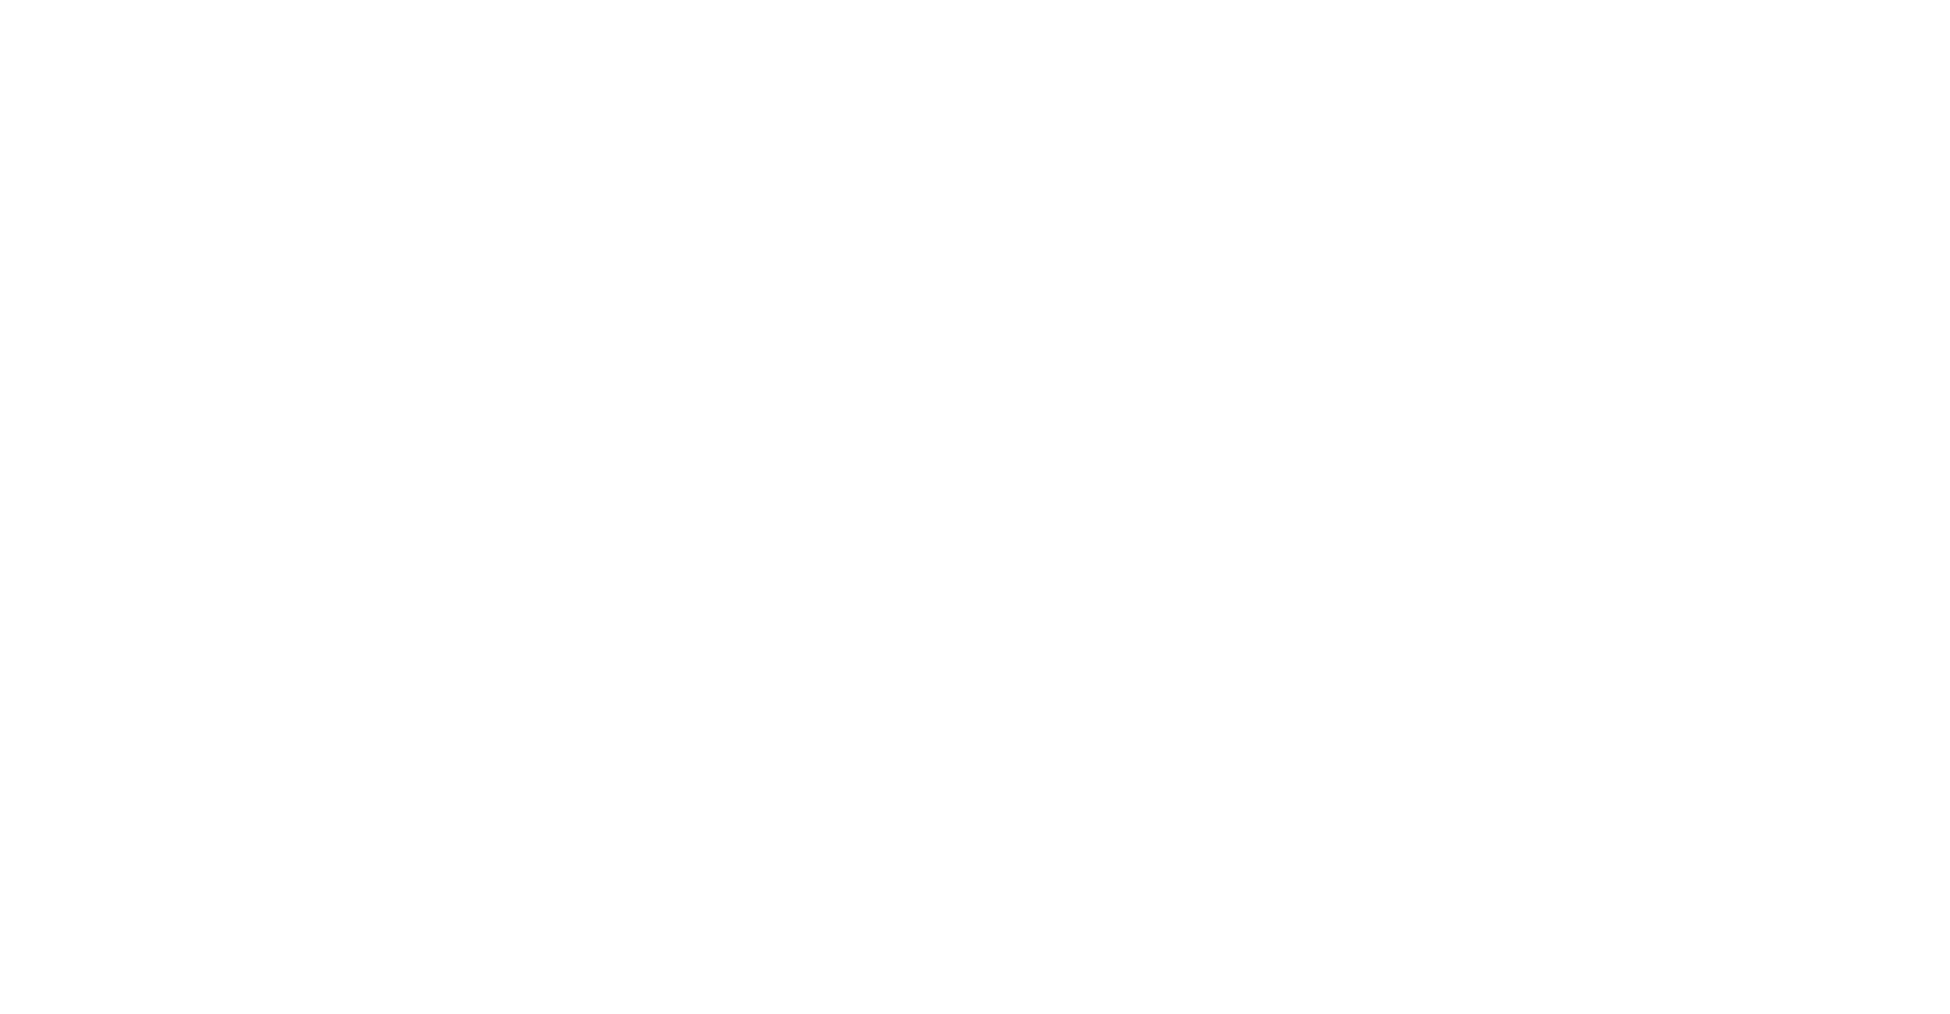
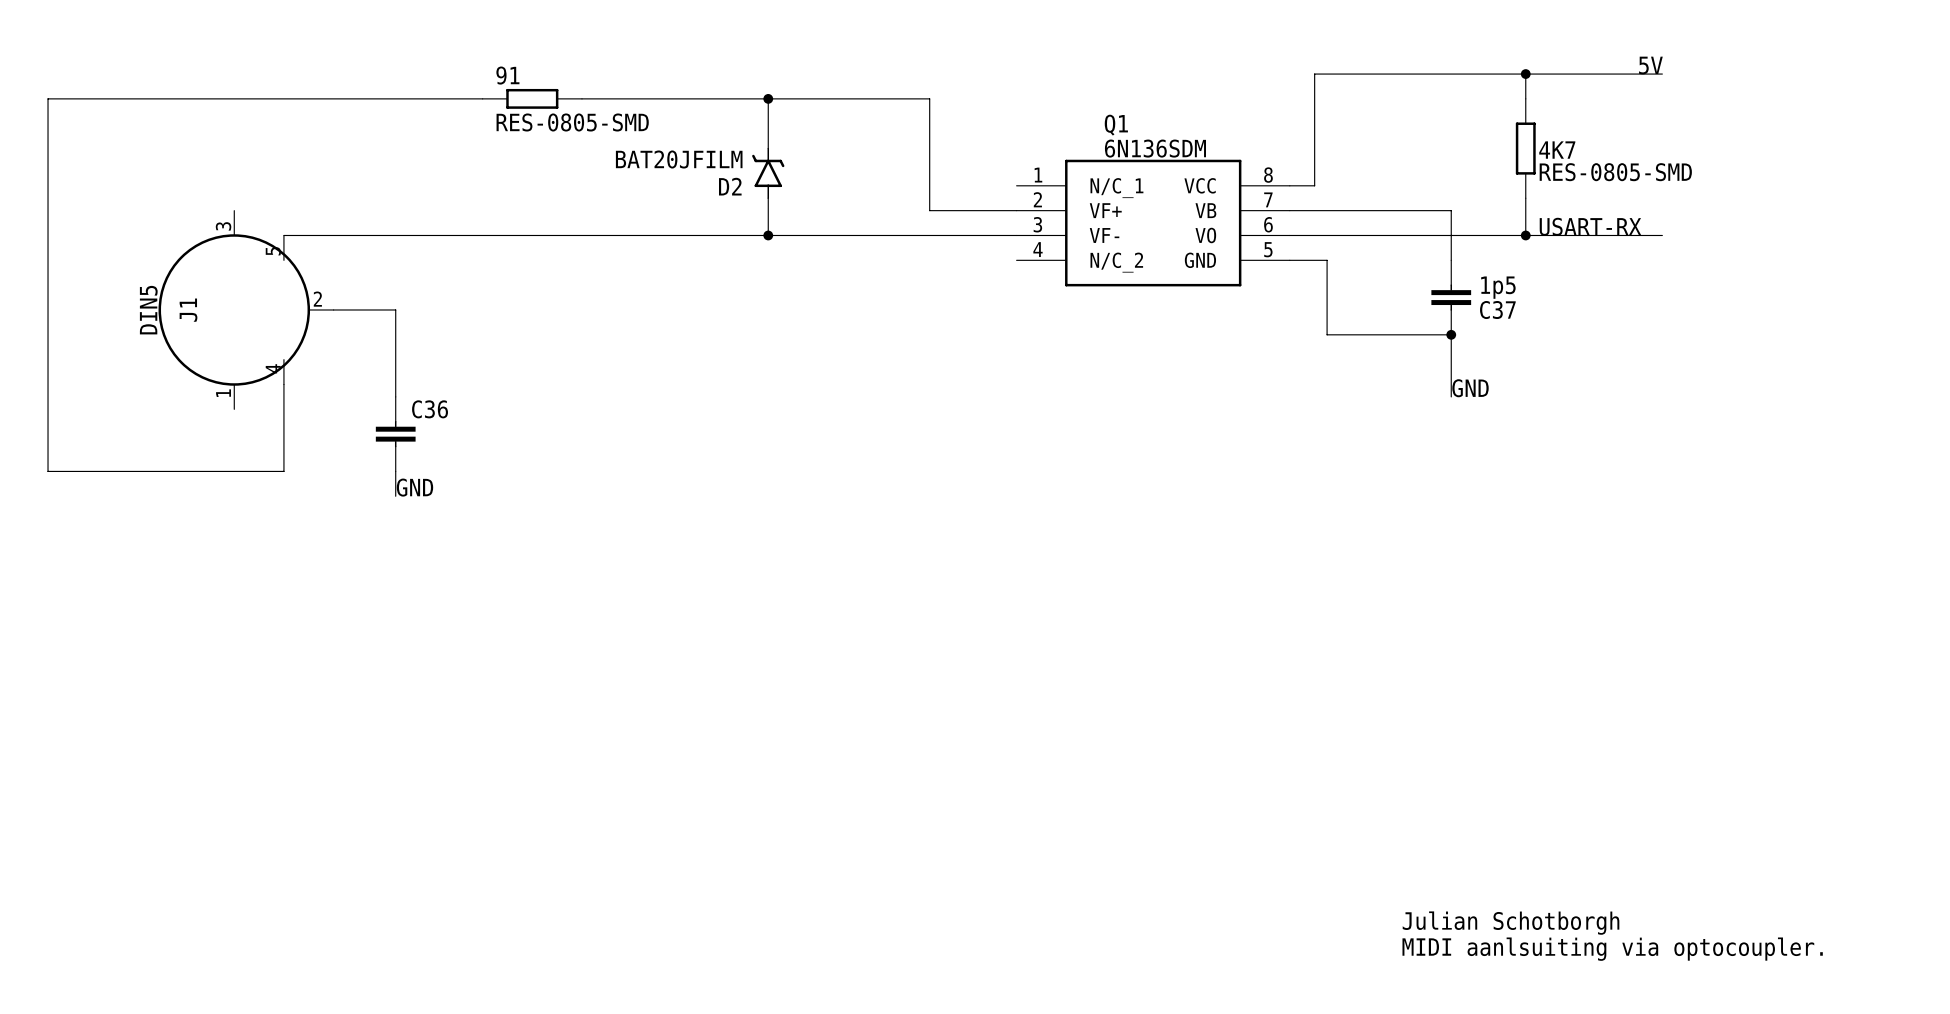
label: none -> 5V (1650, 65)
wire: none -> (1525, 74) (1525, 98)
junction: none -> (1525, 74)
wire: none -> (1662, 74) (1314, 74) (1314, 185) (1289, 185)
wire: none -> (482, 98) (48, 98) (48, 471) (283, 471) (283, 384)
91: none -> RES-0805-SMD (532, 98)
wire: none -> (581, 98) (929, 98) (929, 210) (1016, 210)
wire: none -> (768, 98) (768, 148)
junction: none -> (768, 98)
4K7: none -> RES-0805-SMD (1525, 148)
D2: none -> BAT20JFILM (768, 173)
wire: none -> (768, 198) (768, 235)
wire: none -> (1525, 198) (1525, 235)
wire: none -> (1289, 210) (1451, 210) (1451, 260)
Q1: none -> 6N136SDM (1153, 223)
label: none -> USART-RX (1590, 226)
wire: none -> (283, 235) (1016, 235)
junction: none -> (768, 235)
wire: none -> (1289, 235) (1662, 235)
junction: none -> (1525, 235)
wire: none -> (1289, 260) (1327, 260) (1327, 334) (1451, 334) (1451, 396)
C37: none -> 1p5 (1451, 297)
J1: none -> DIN5 (246, 309)
wire: none -> (333, 309) (395, 309) (395, 396)
junction: none -> (1451, 334)
label: none -> GND (1470, 388)
C36: none -> (395, 434)
wire: none -> (395, 471) (395, 496)
label: none -> GND (414, 487)
text: none -> Julian Schotborgh (1511, 923)
text: none -> MIDI aanlsuiting via optocoupler. (1612, 949)

